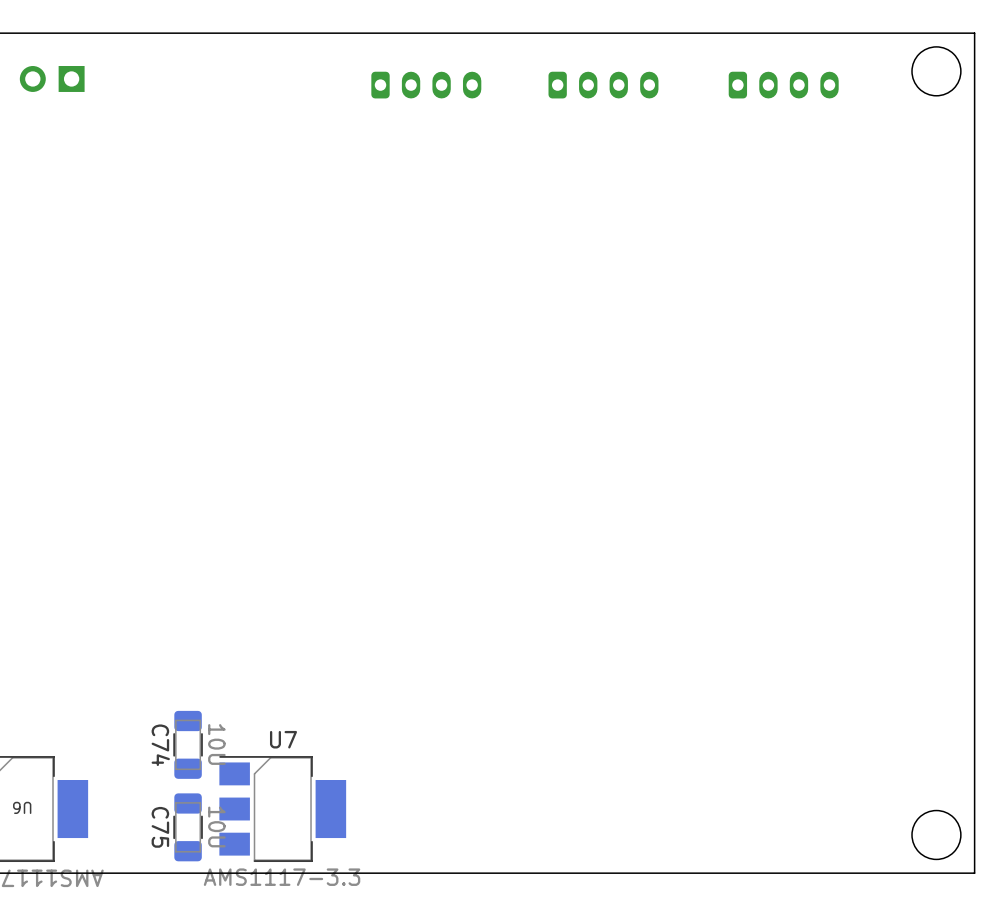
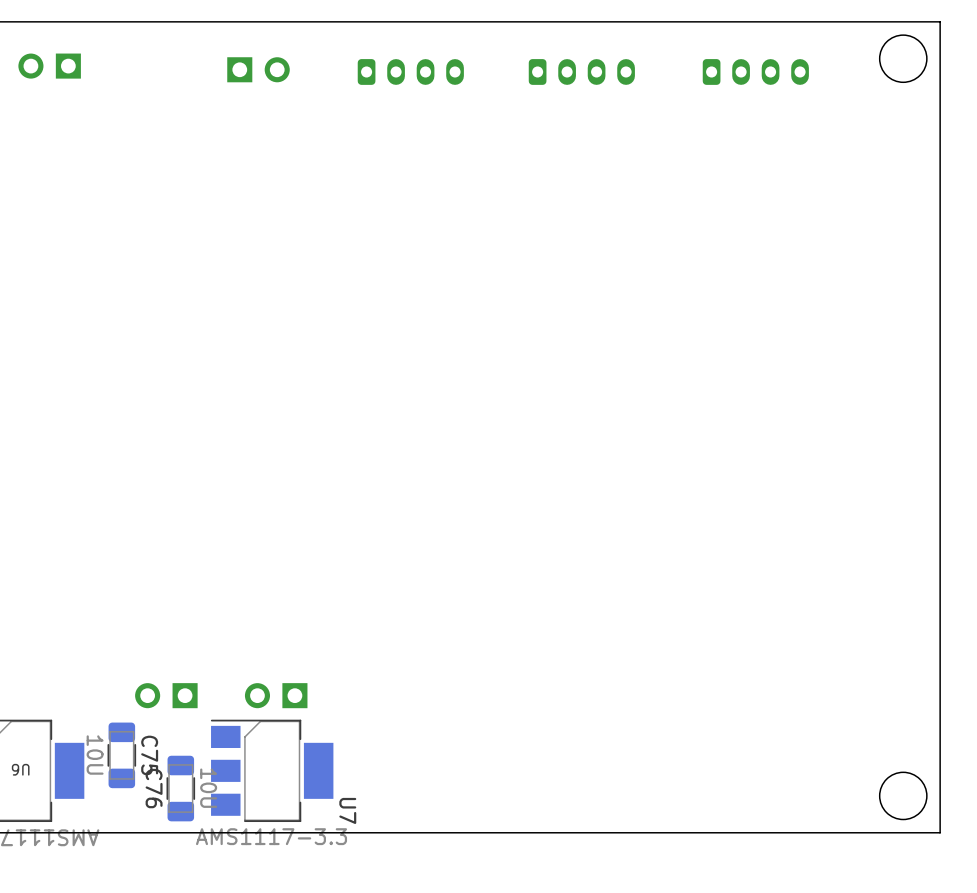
part: none -> (258, 69)
part: none -> (166, 695)
part: none -> (276, 695)
U7 name rotation: 0° (283, 739) -> 90° clockwise (347, 810)
U7 name position: U7 (283, 739) -> U7 (347, 810)
C74: 10U (188, 744) -> none
C75: none -> 10U (121, 755)
C75 name: C75 (160, 827) -> C76 (154, 788)

